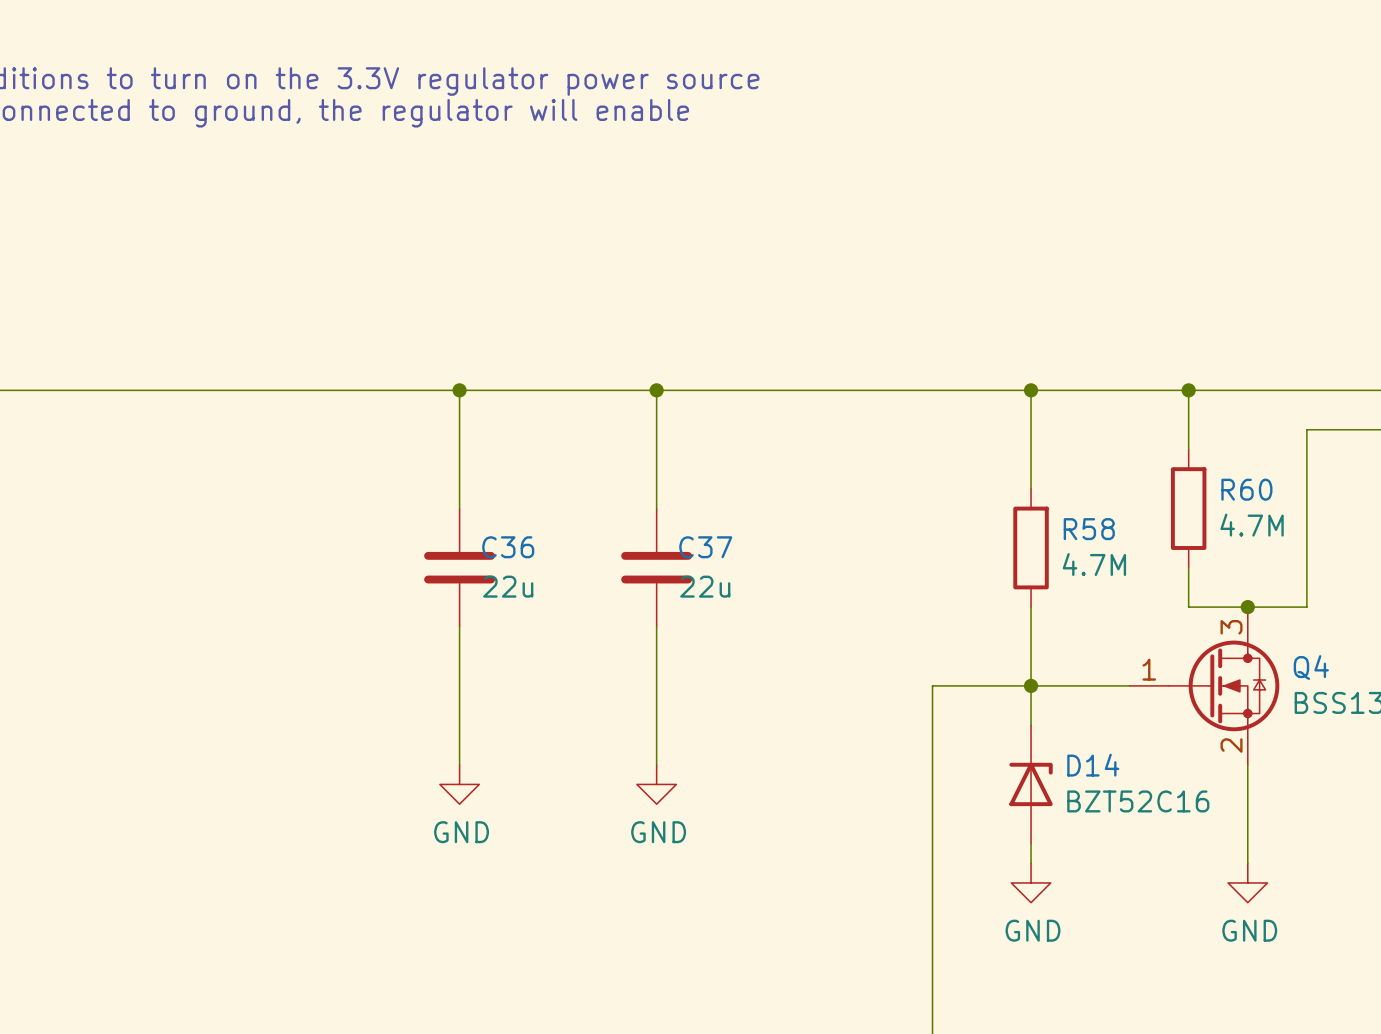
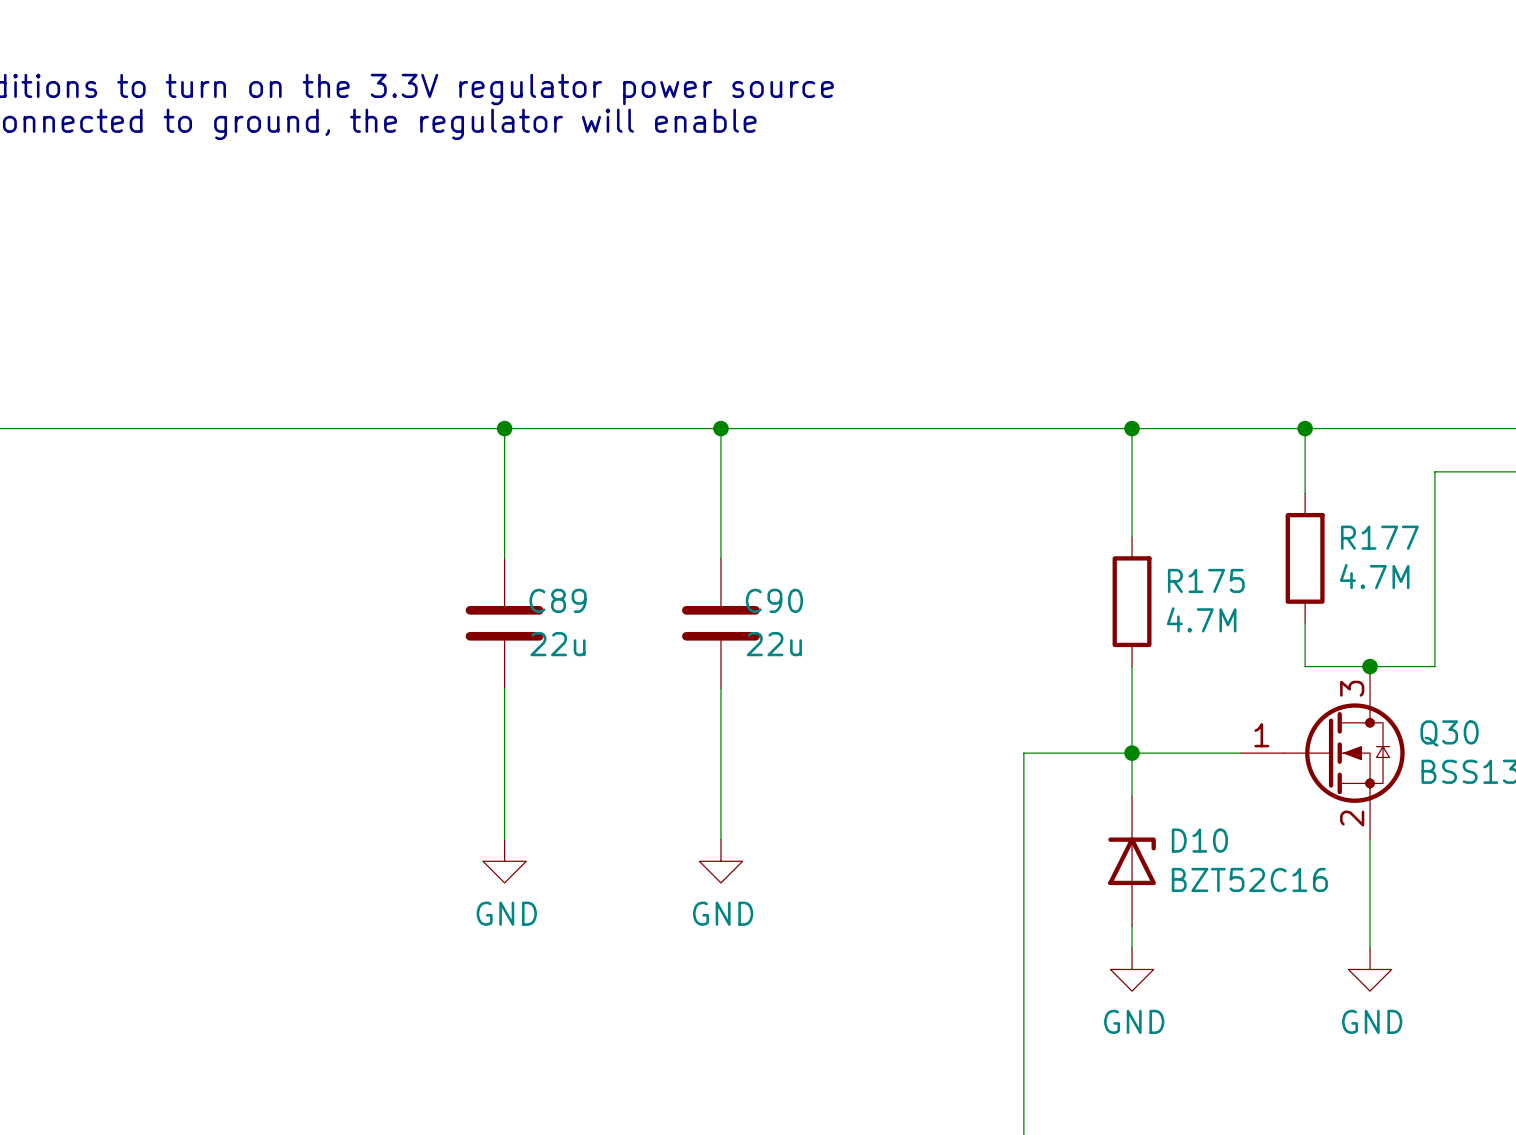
R60 name: R60 (1246, 489) -> R177 (1379, 537)
R58 name: R58 (1089, 529) -> R175 (1206, 580)
C36 name: C36 (508, 547) -> C89 (558, 600)
C37 name: C37 (705, 547) -> C90 (774, 600)
Q4 name: Q4 (1311, 667) -> Q30 (1449, 733)
D14 name: D14 (1093, 765) -> D10 (1199, 840)

